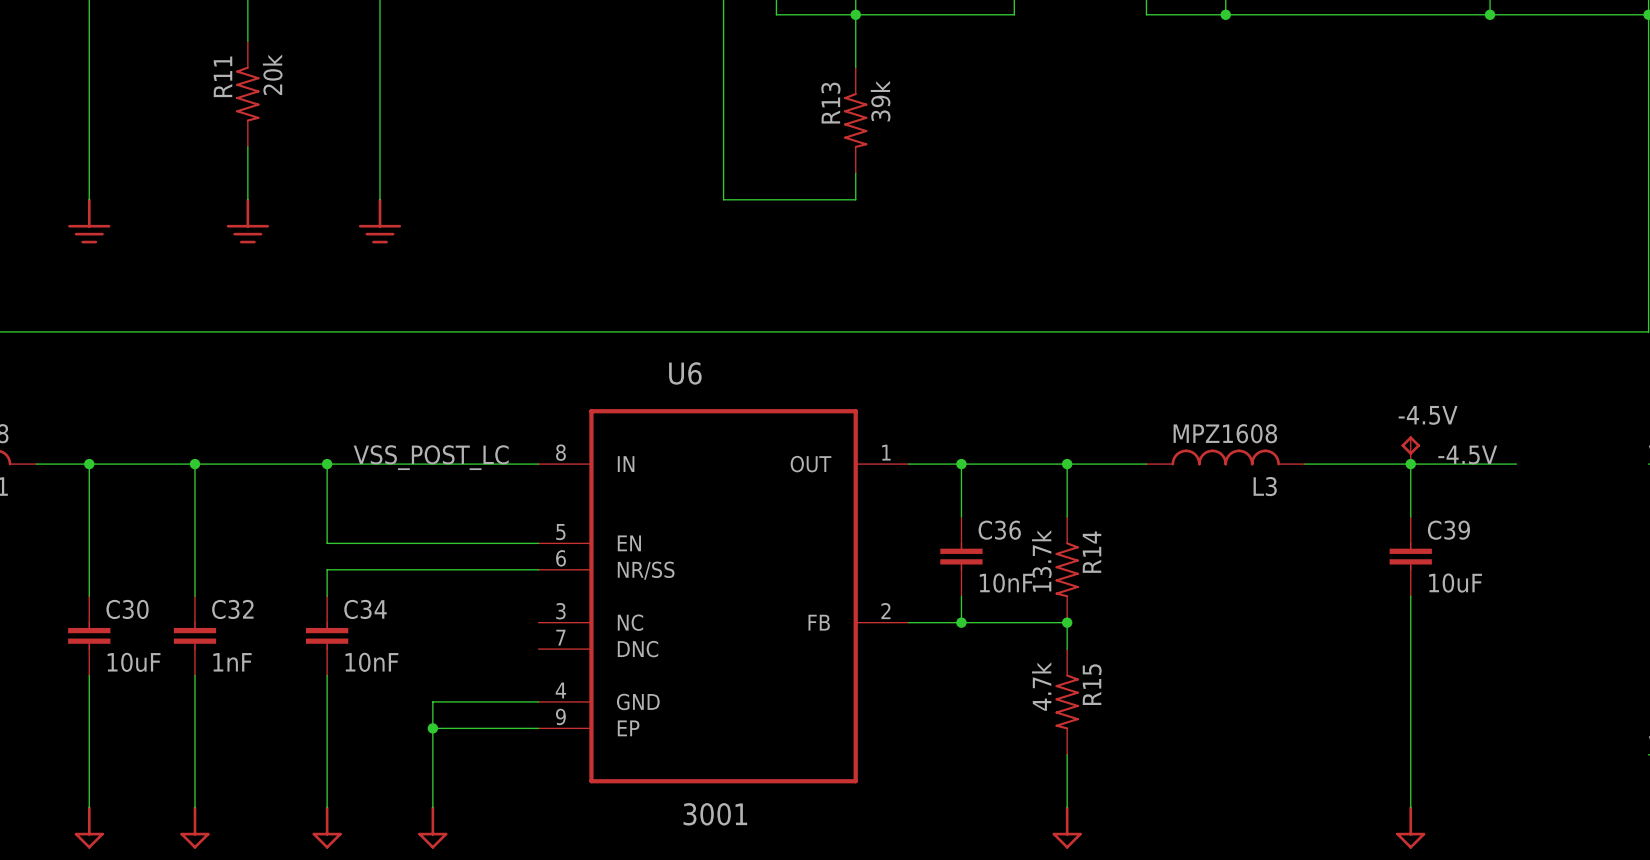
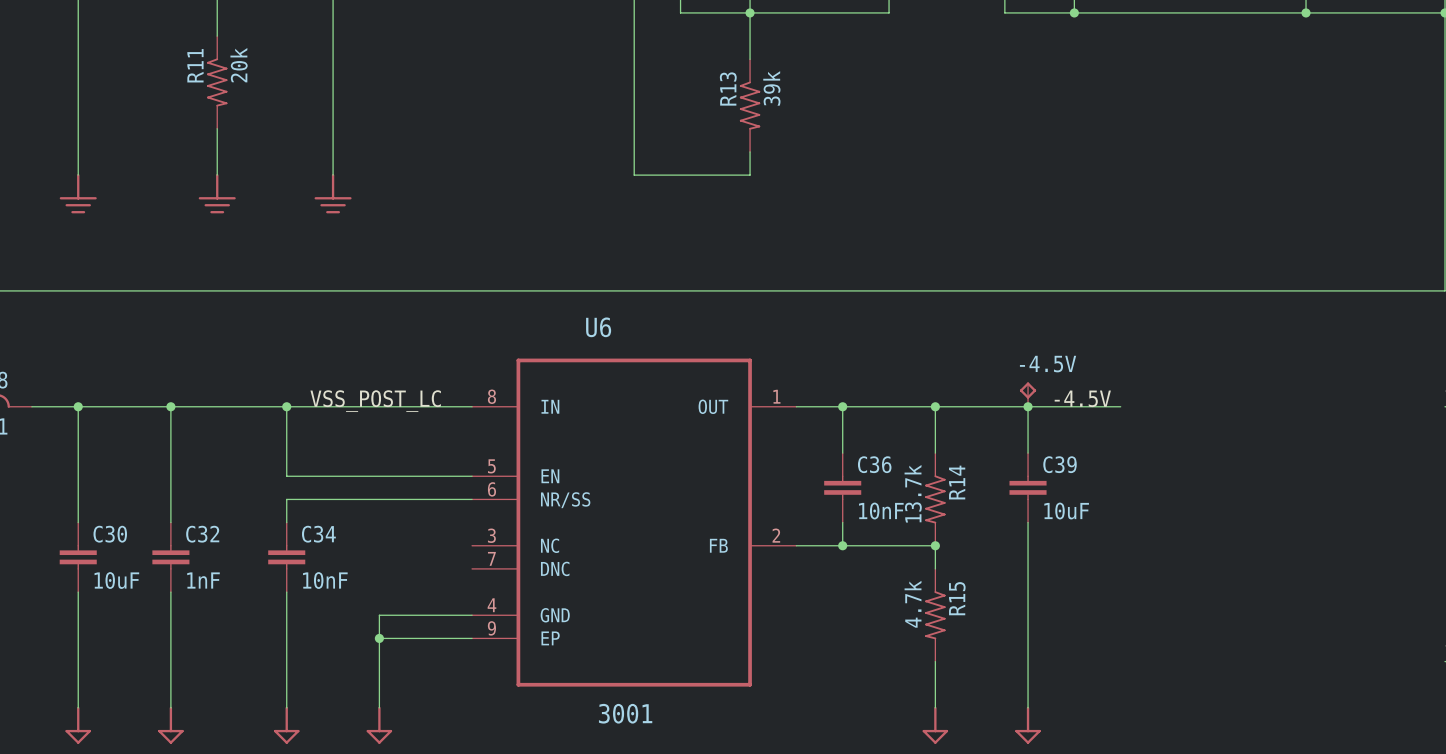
-4.5V position: (1410, 450) -> (1028, 394)
label position: -4.5V (1467, 455) -> -4.5V (1082, 398)
L3: MPZ1608 (1225, 457) -> none
wire: none -> (1004, 406) (1120, 406)
junction: none -> (1028, 406)
wire: (1305, 464) (1516, 464) -> none
wire: (1410, 464) (1410, 516) -> (1028, 406) (1028, 453)
junction: (1410, 464) -> none
C39 position: (1410, 556) -> (1028, 487)
wire: (1410, 596) (1410, 807) -> (1028, 522) (1028, 707)
part position: (1410, 827) -> (1028, 725)

